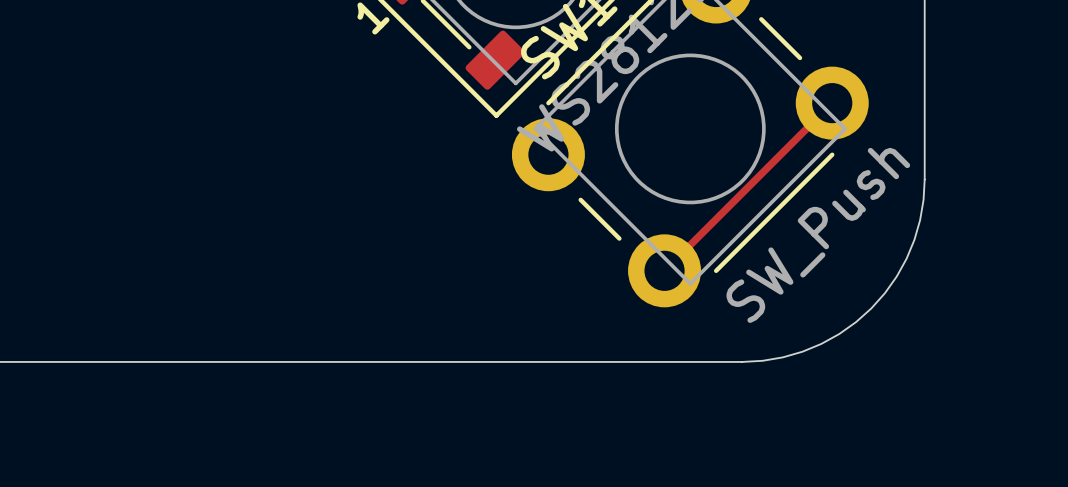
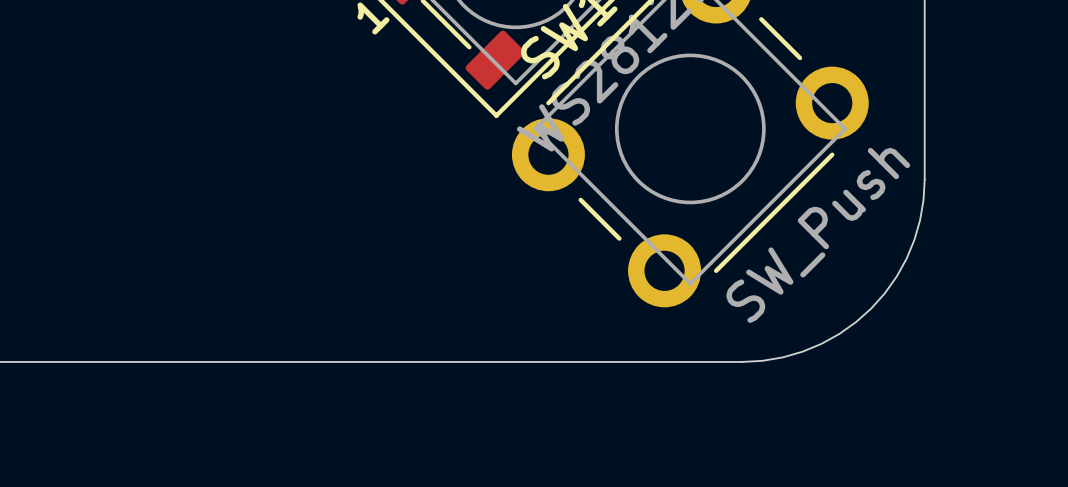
track: (832, 103) (664, 270) -> none

